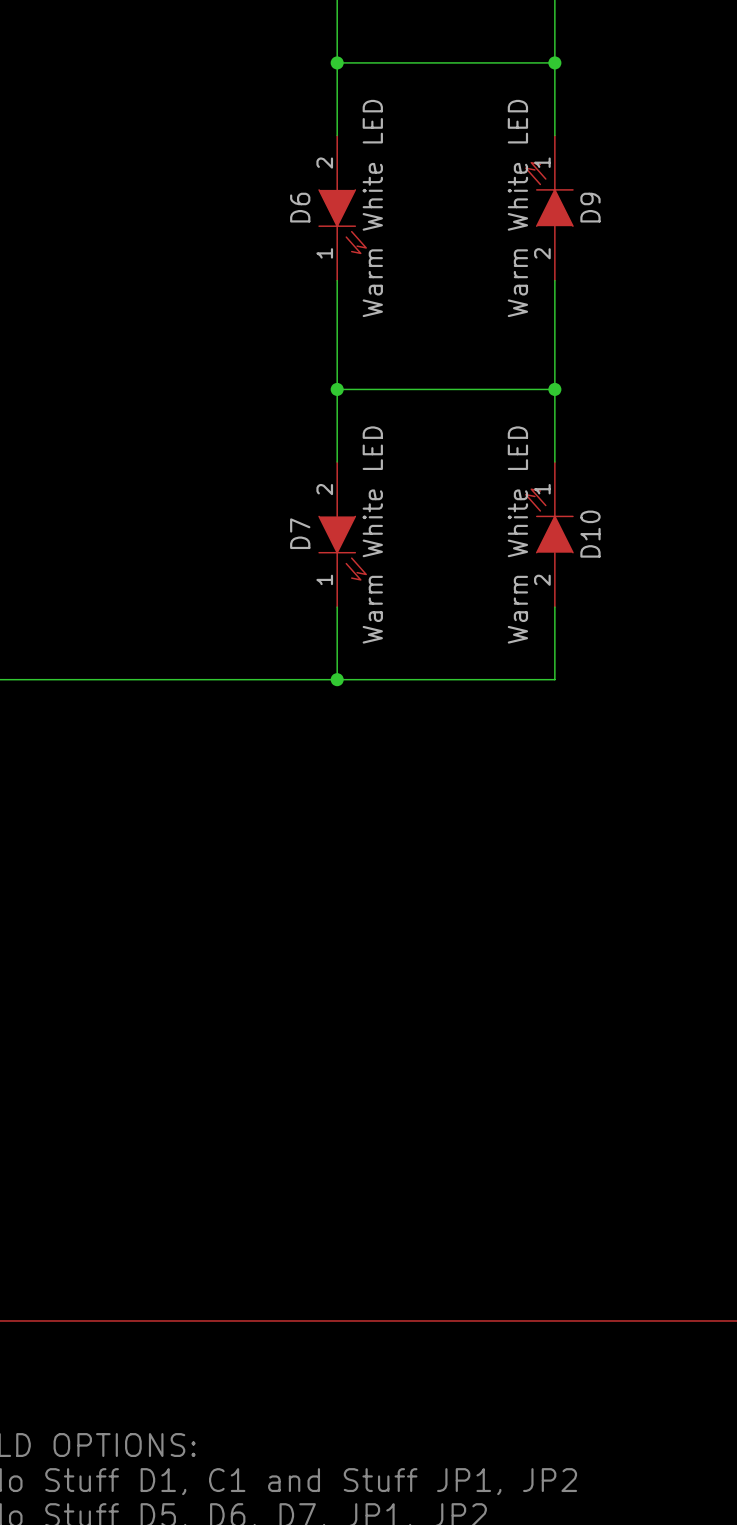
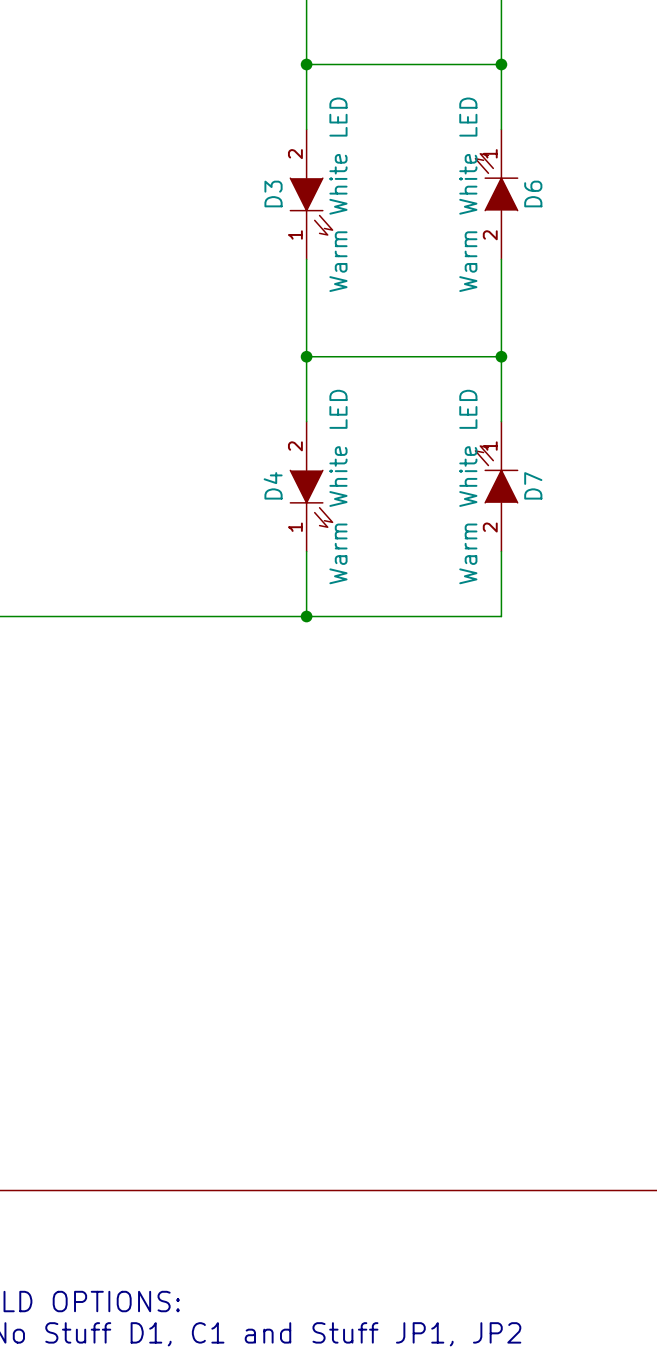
D6 name: D6 (300, 207) -> D3 (273, 194)
D9 name: D9 (590, 207) -> D6 (533, 194)
D7 name: D7 (300, 533) -> D4 (273, 485)
D10 name: D10 (590, 534) -> D7 (533, 485)

